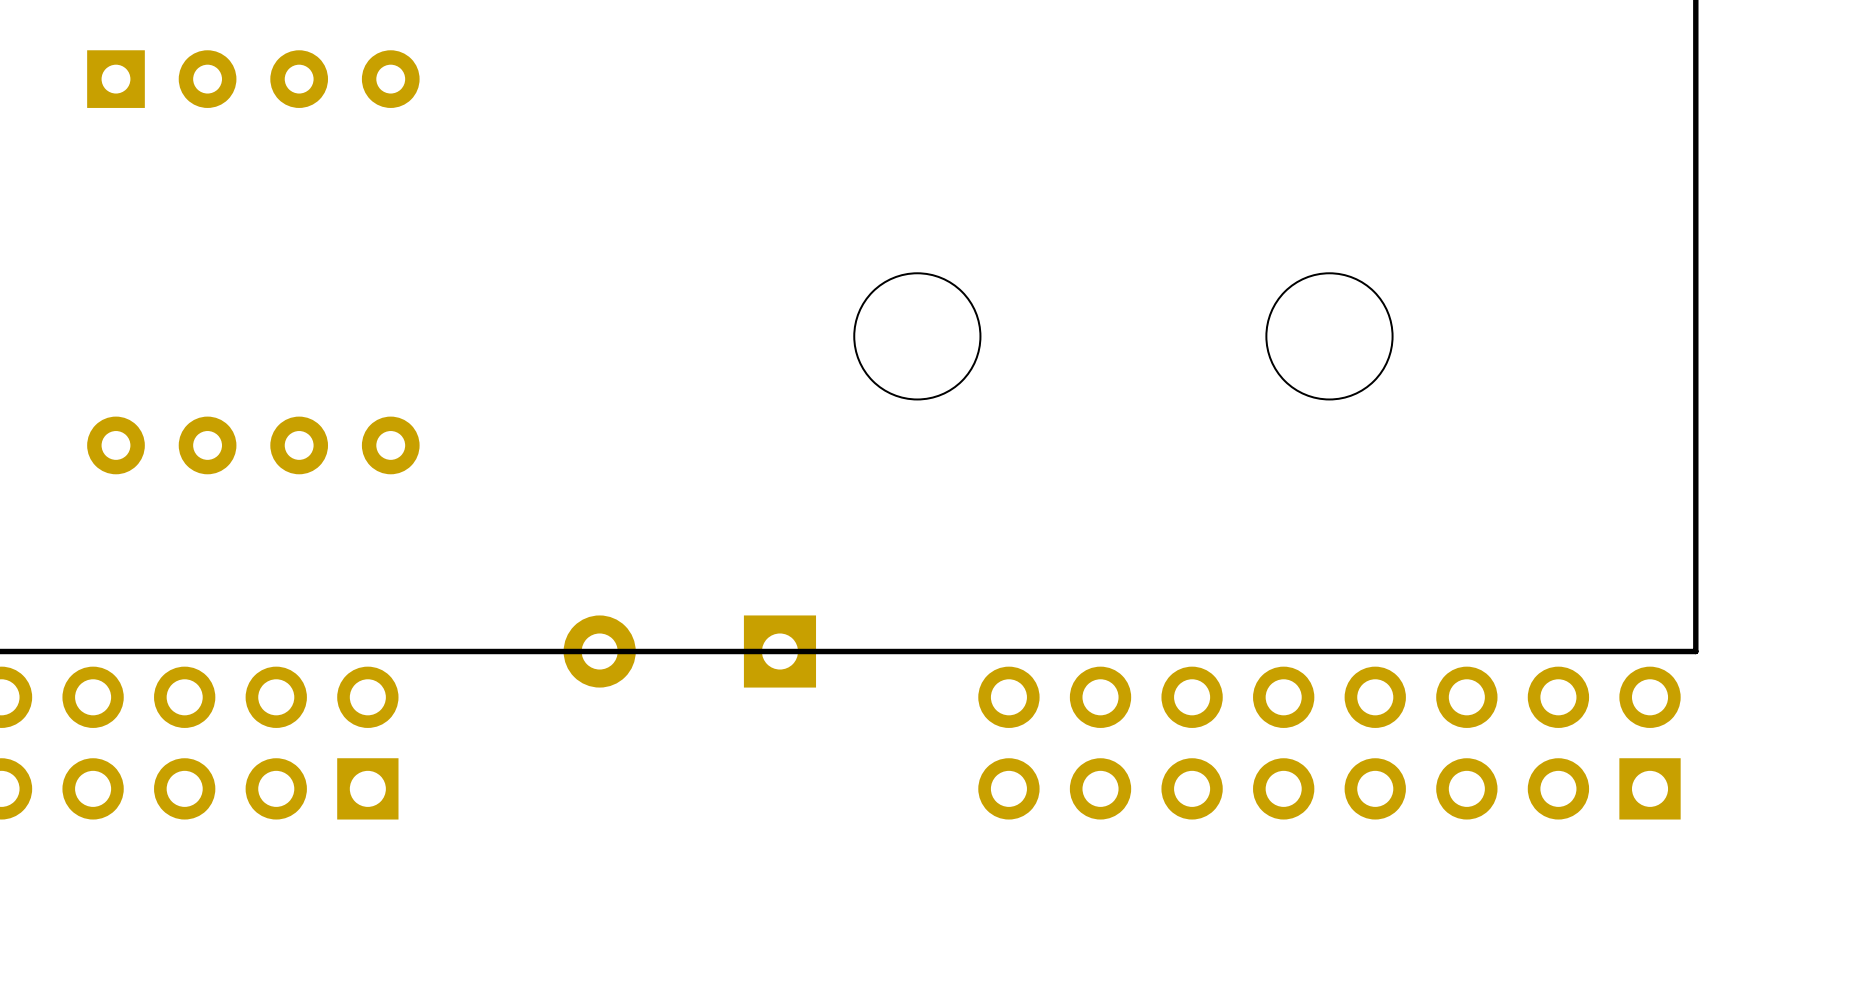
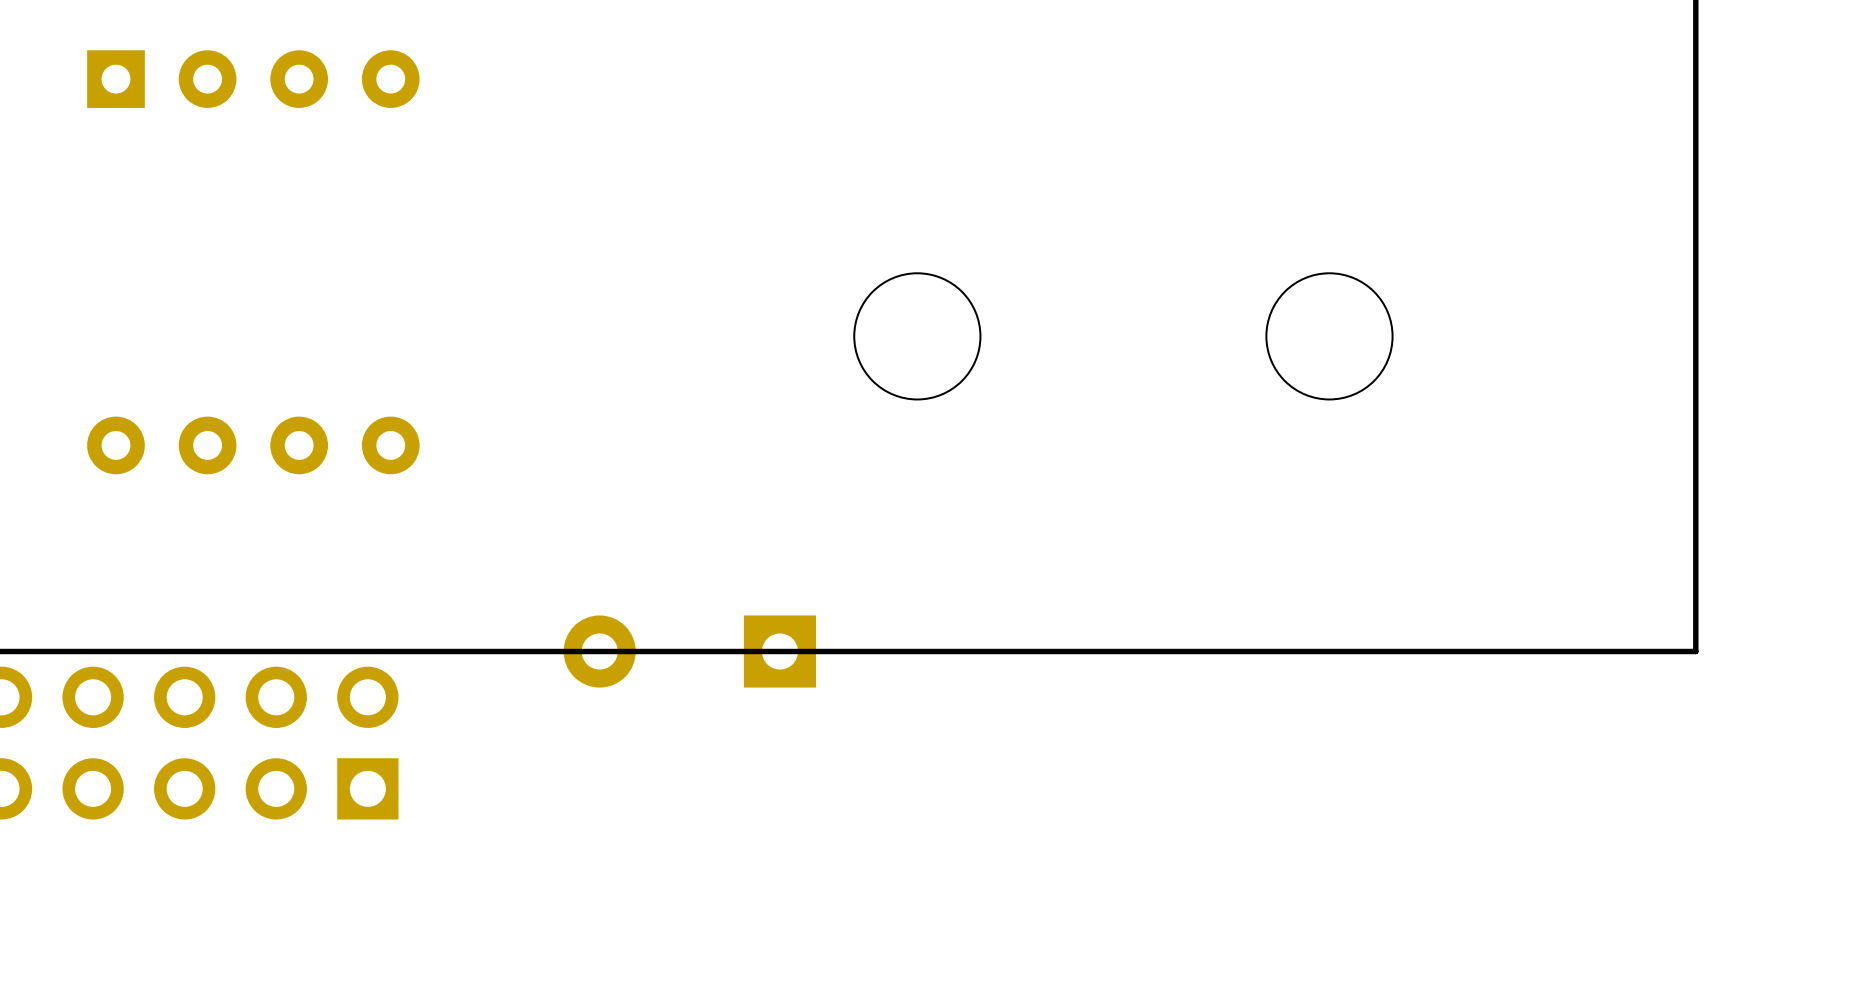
part: (1329, 743) -> none

